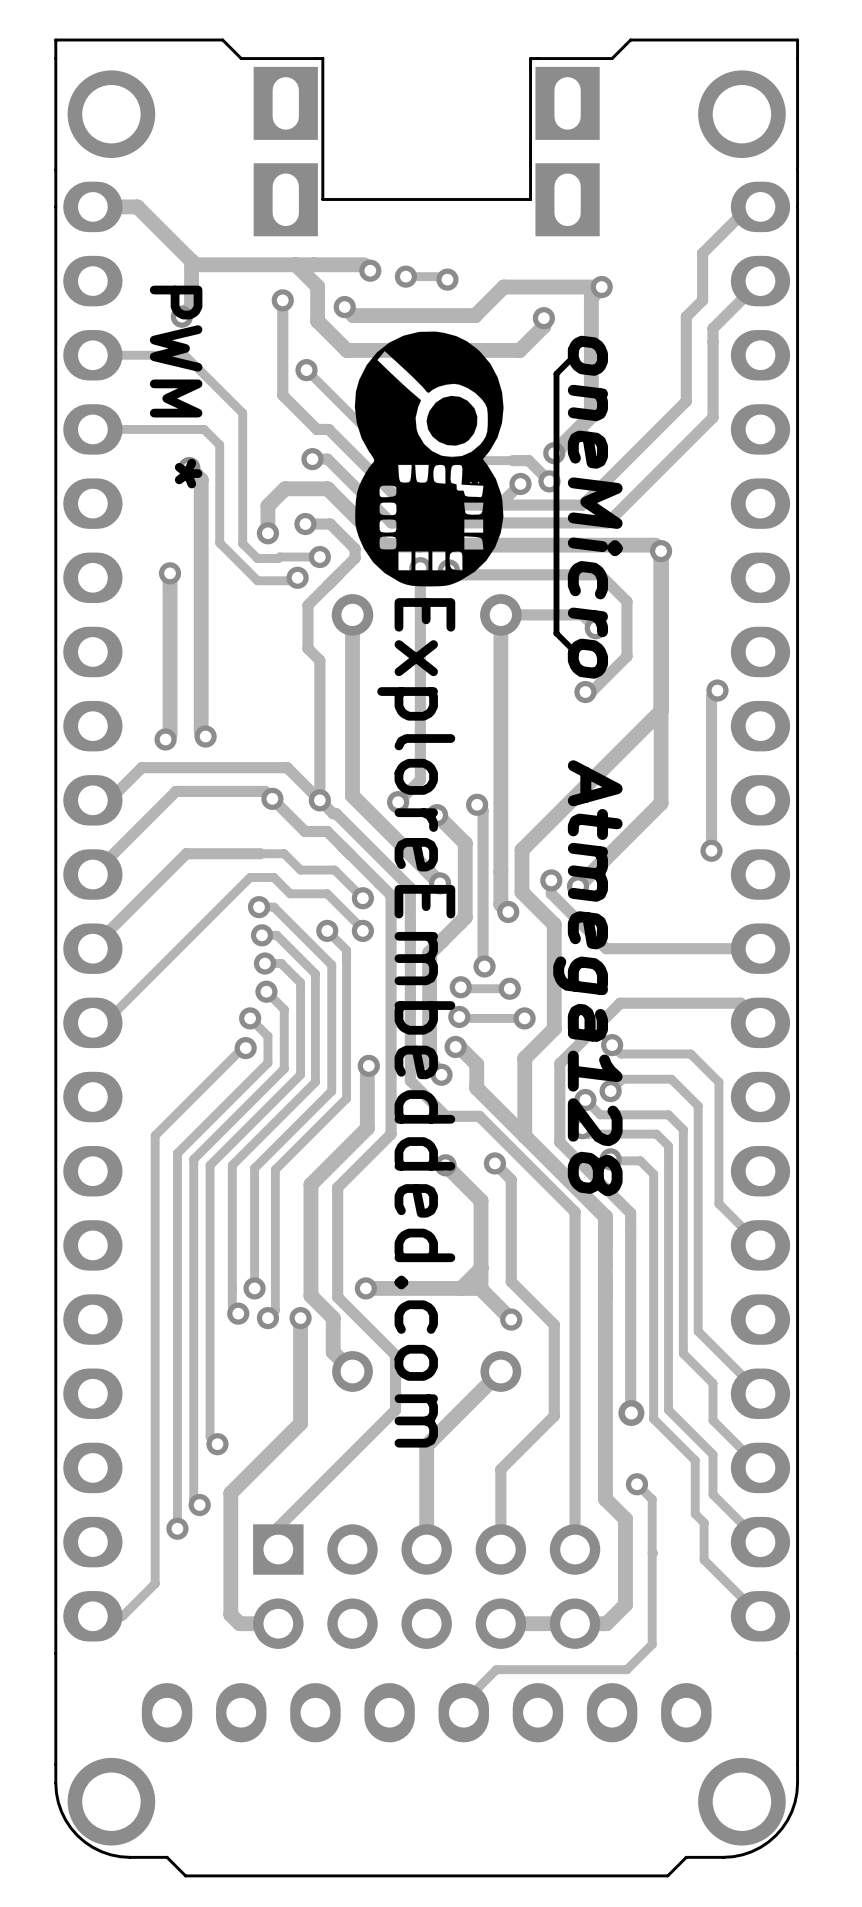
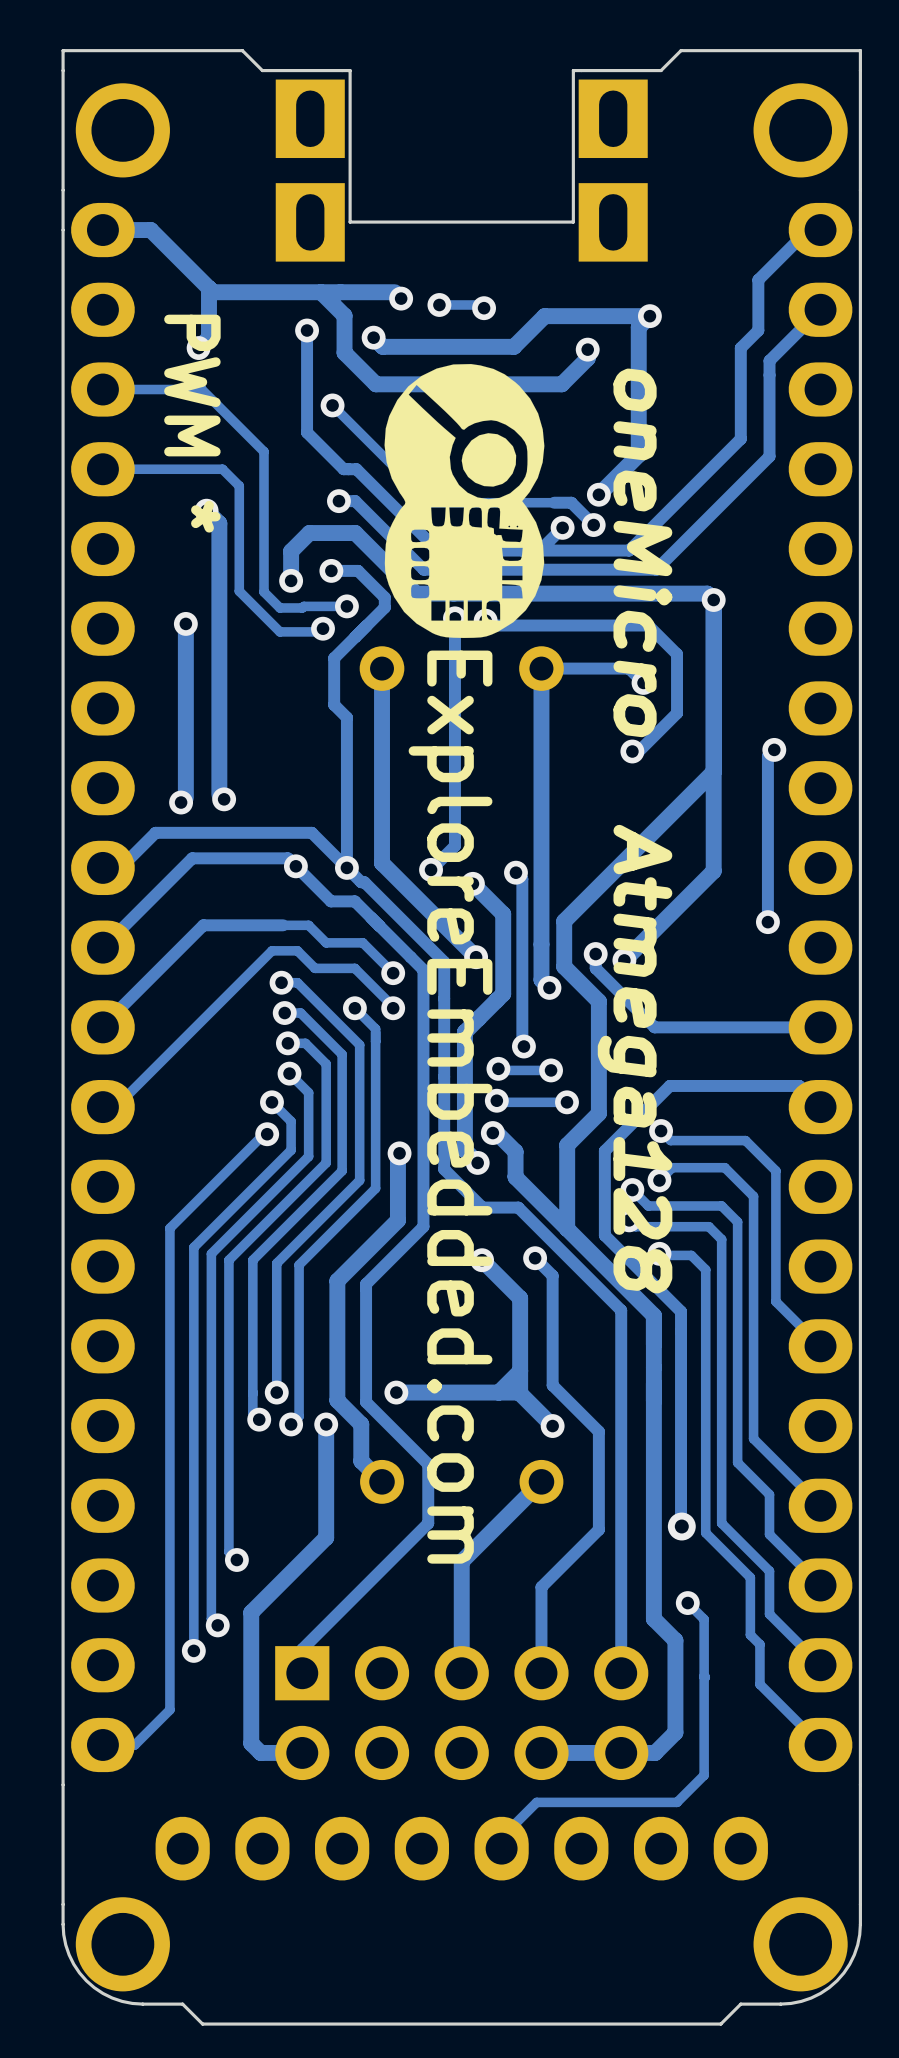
line: (575, 355) (556, 373) (556, 633) (575, 651) -> none

